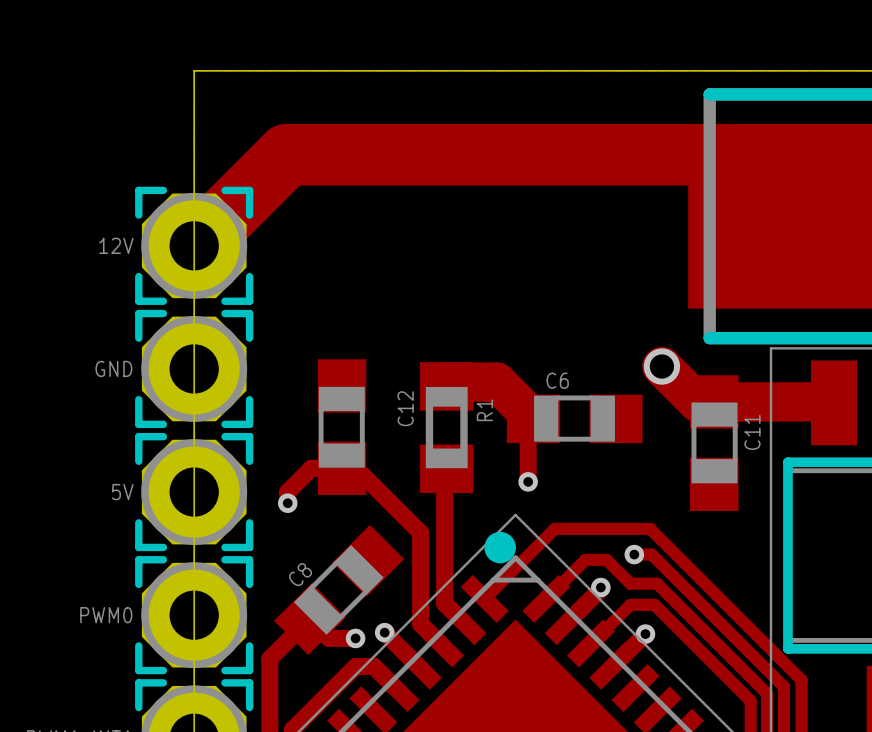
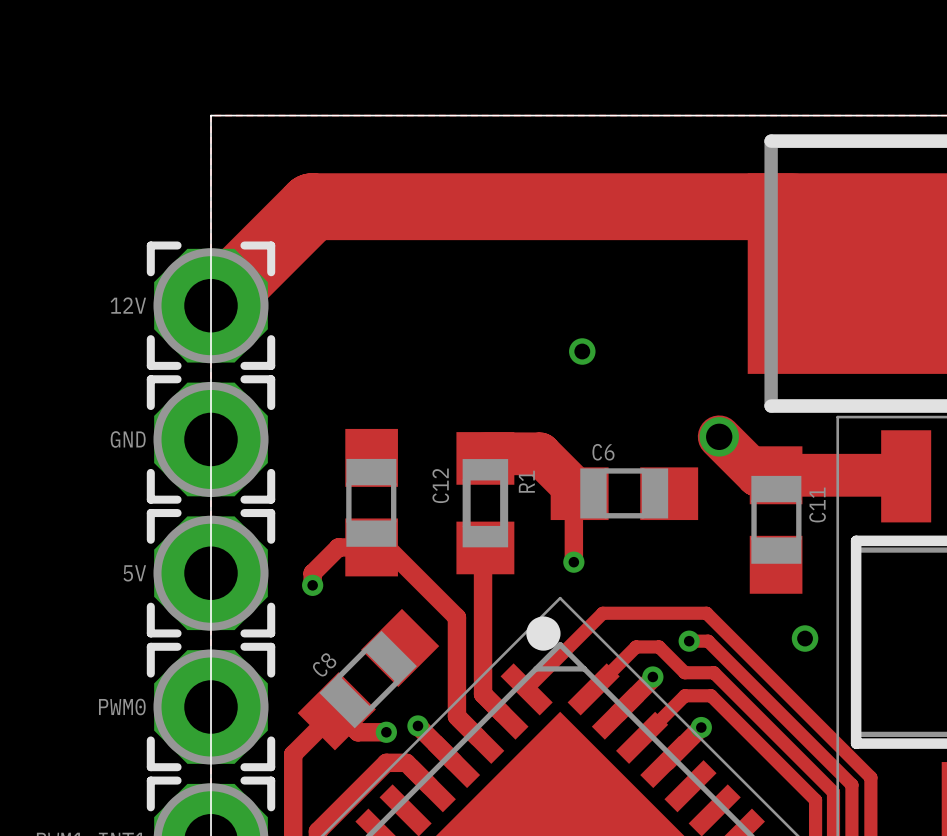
via: none -> (582, 351)
via: none -> (805, 638)

